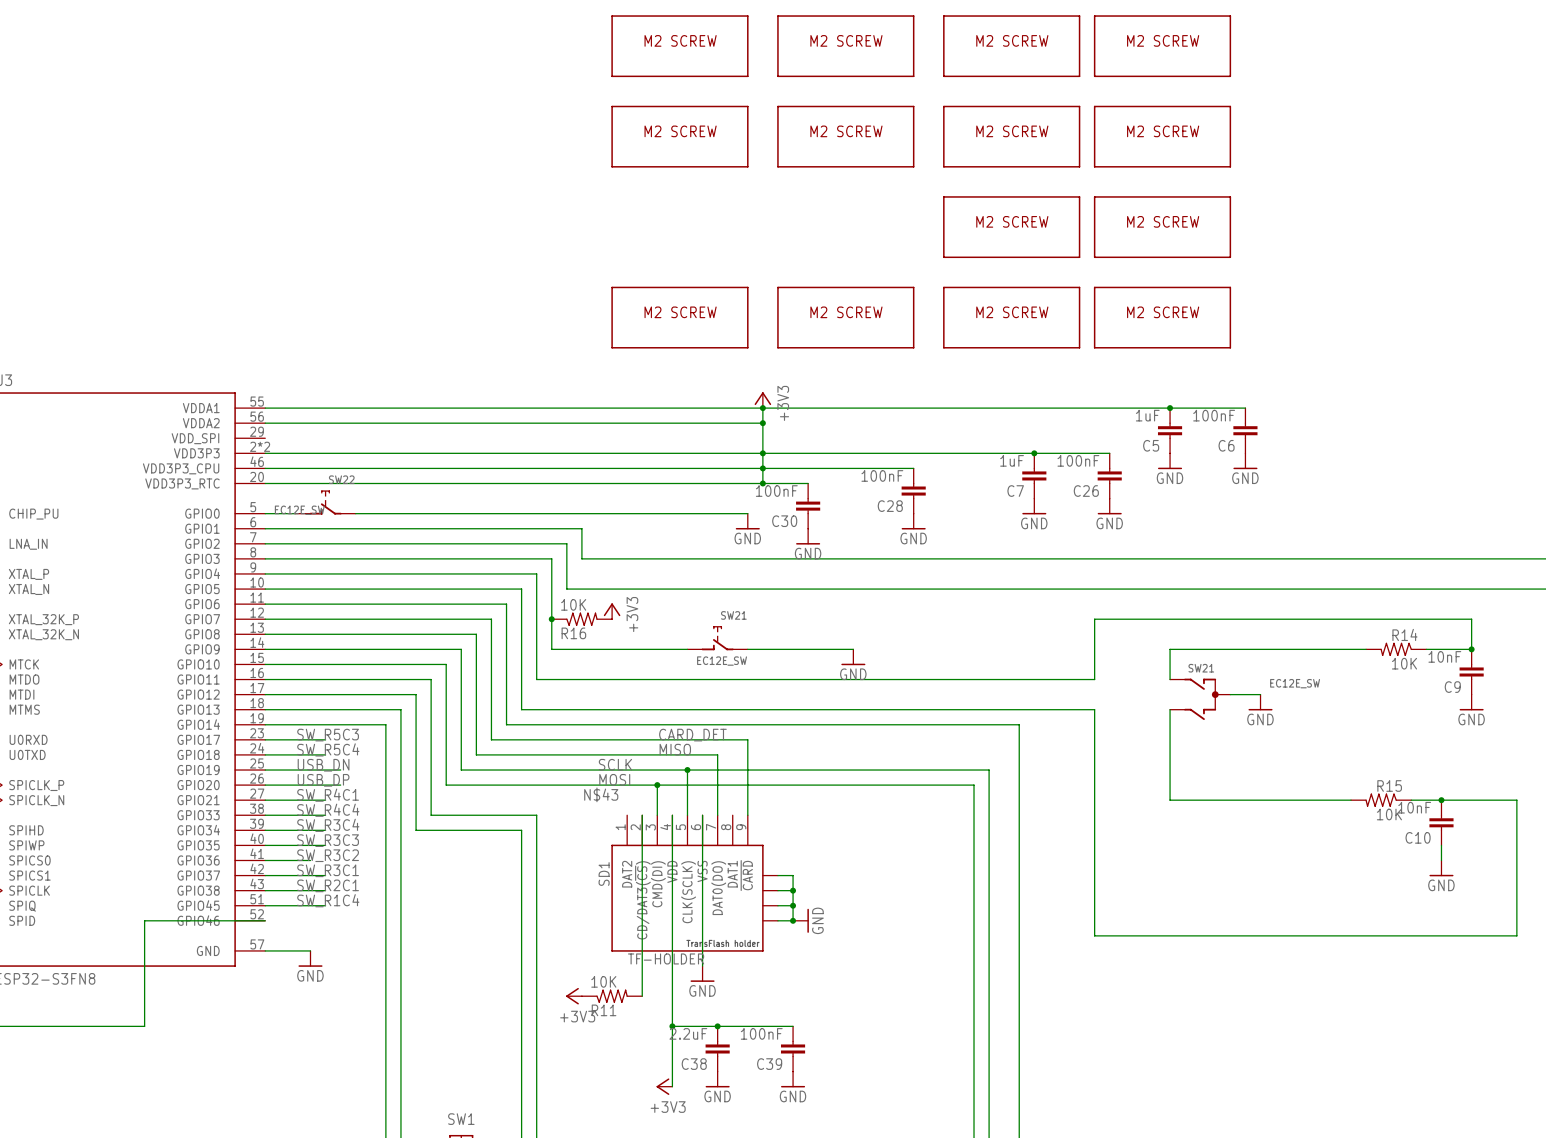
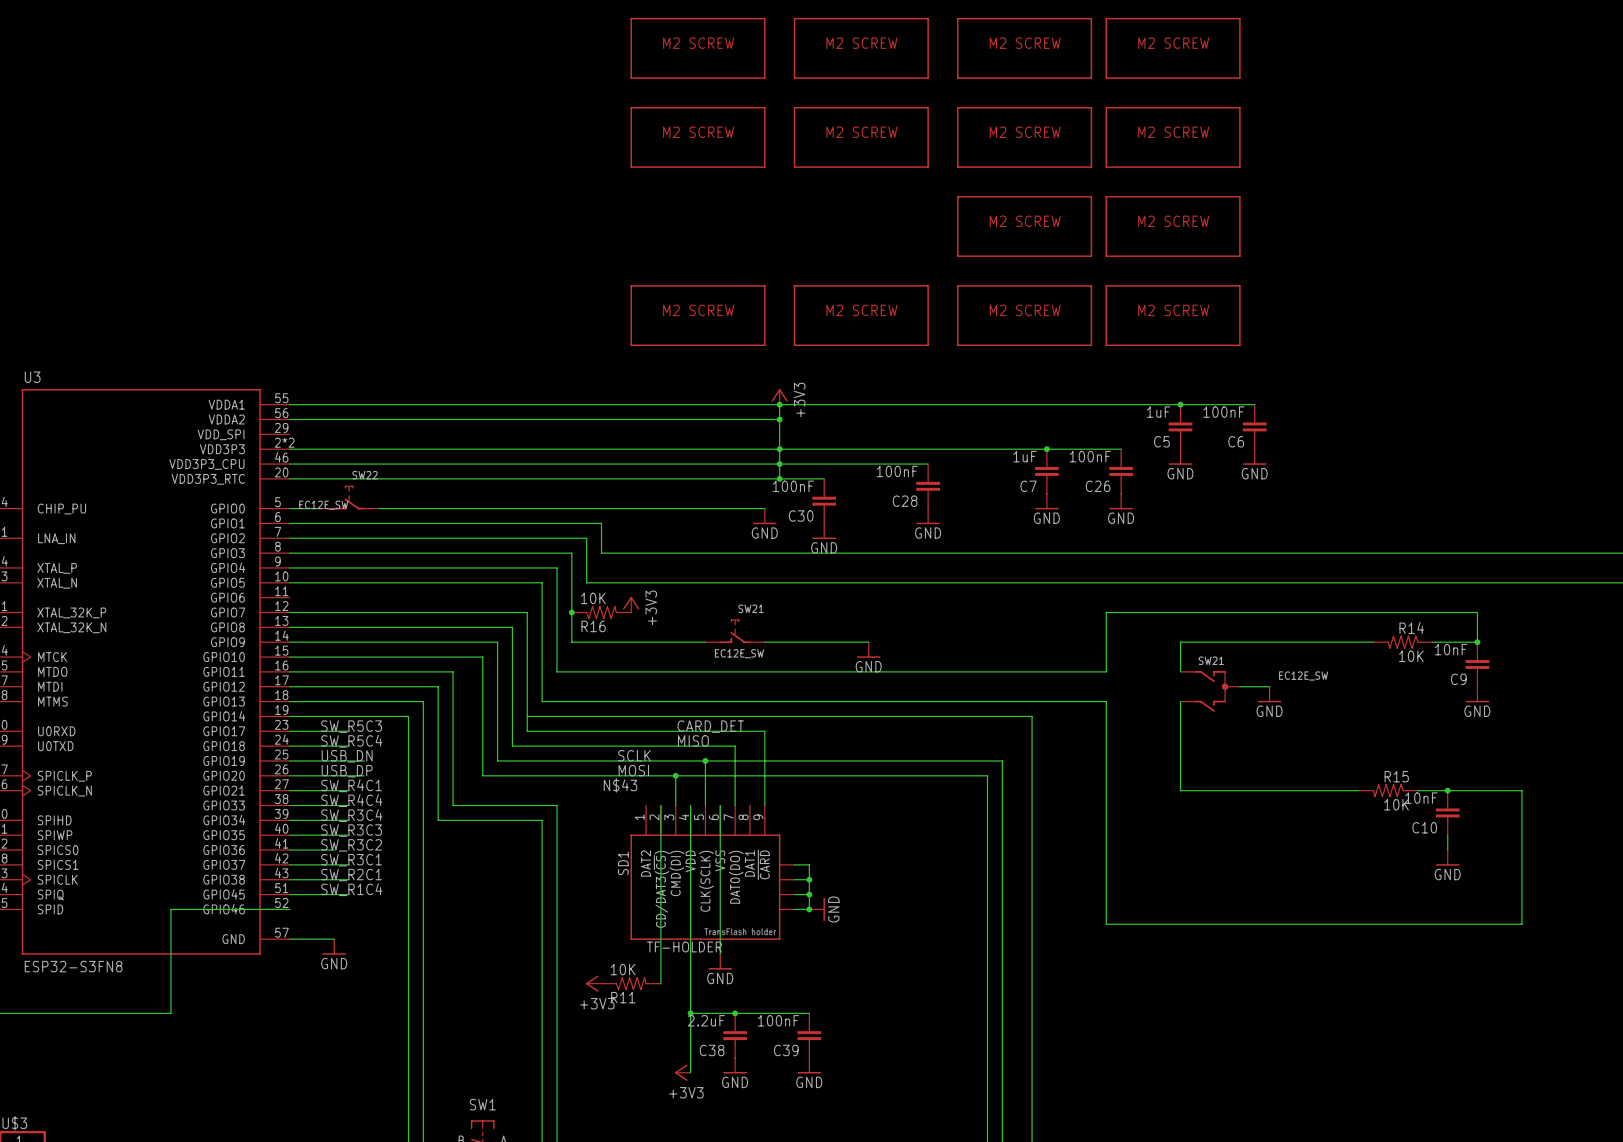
wire: (265, 604) (506, 604) (506, 619) -> none
wire: (491, 619) (491, 634) -> (512, 612) (527, 612)
wire: (476, 634) (476, 649) -> (497, 627) (512, 627)
wire: (461, 649) (461, 664) -> (482, 642) (497, 642)
wire: (446, 664) (446, 785) (461, 785) -> (482, 760) (482, 775)
wire: none -> (467, 657) (482, 657)
wire: (491, 739) (506, 739) -> (527, 716) (527, 731)
wire: (476, 754) (491, 754) -> (512, 731) (512, 746)
wire: (461, 770) (476, 770) -> (497, 746) (497, 760)

